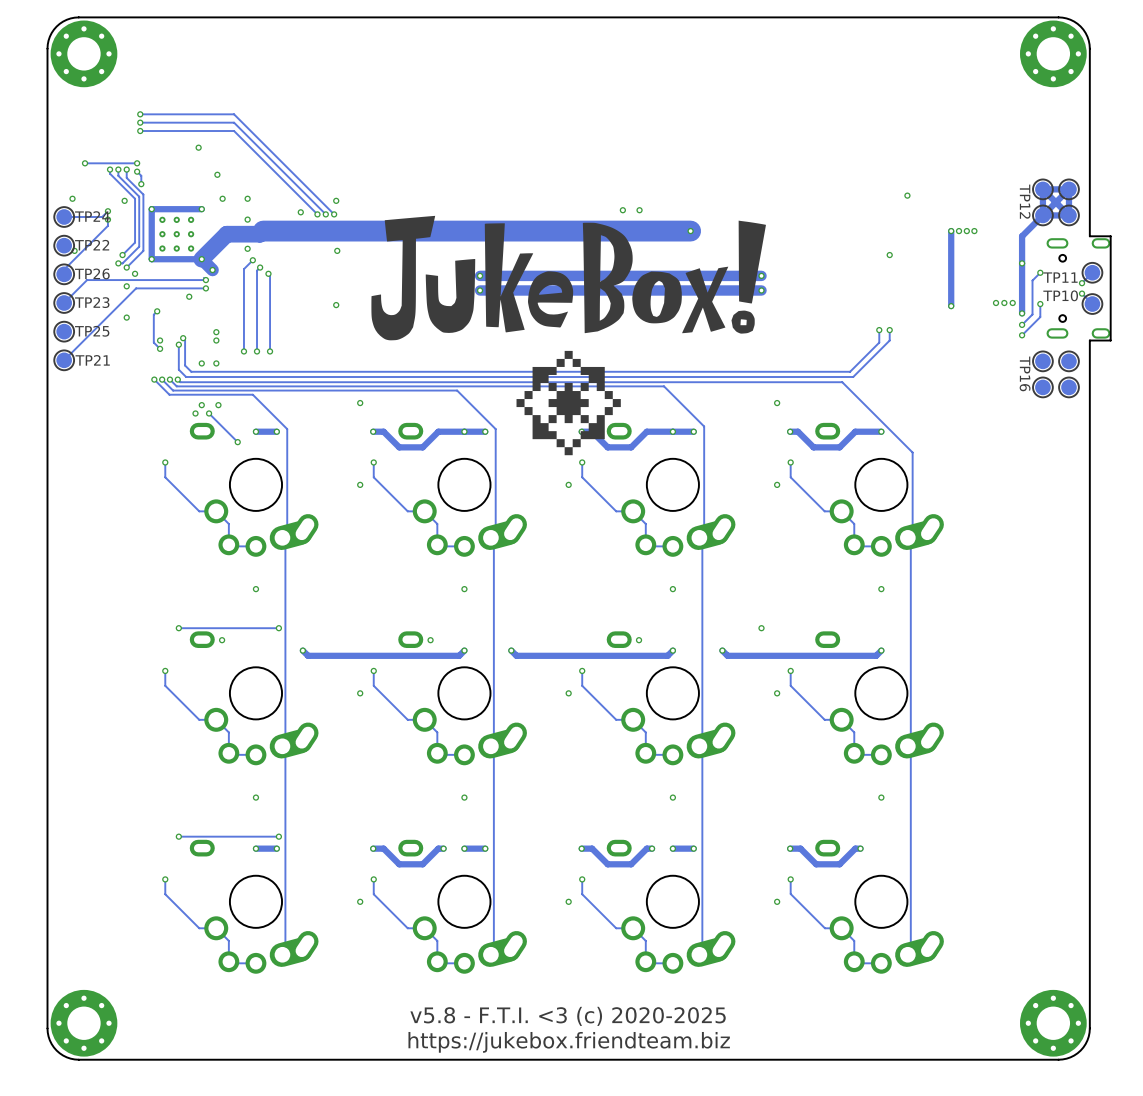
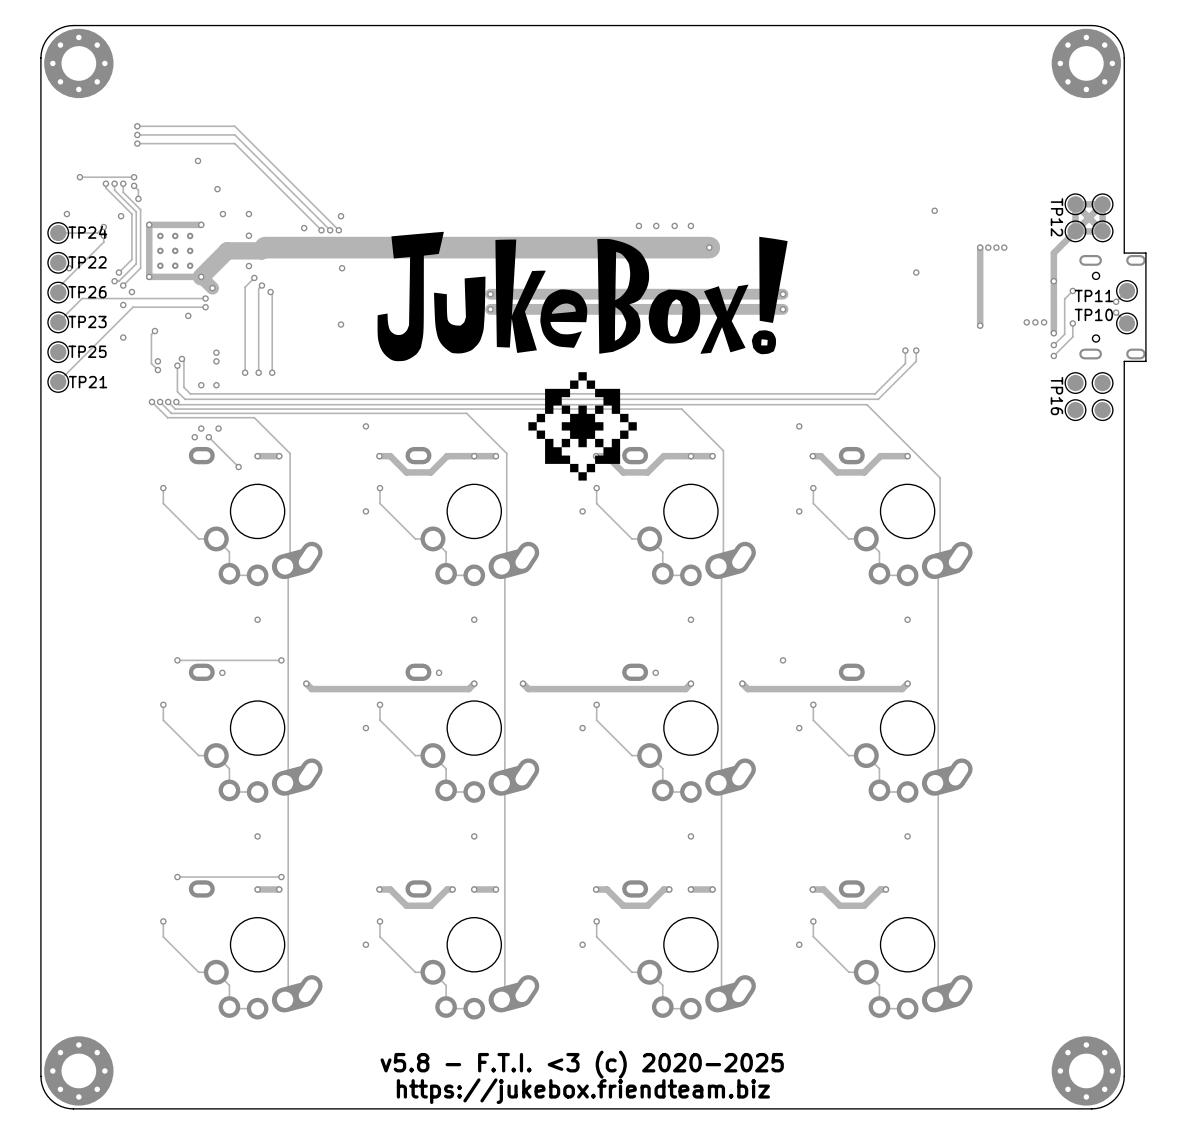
via: none -> (674, 225)
via: none -> (690, 225)

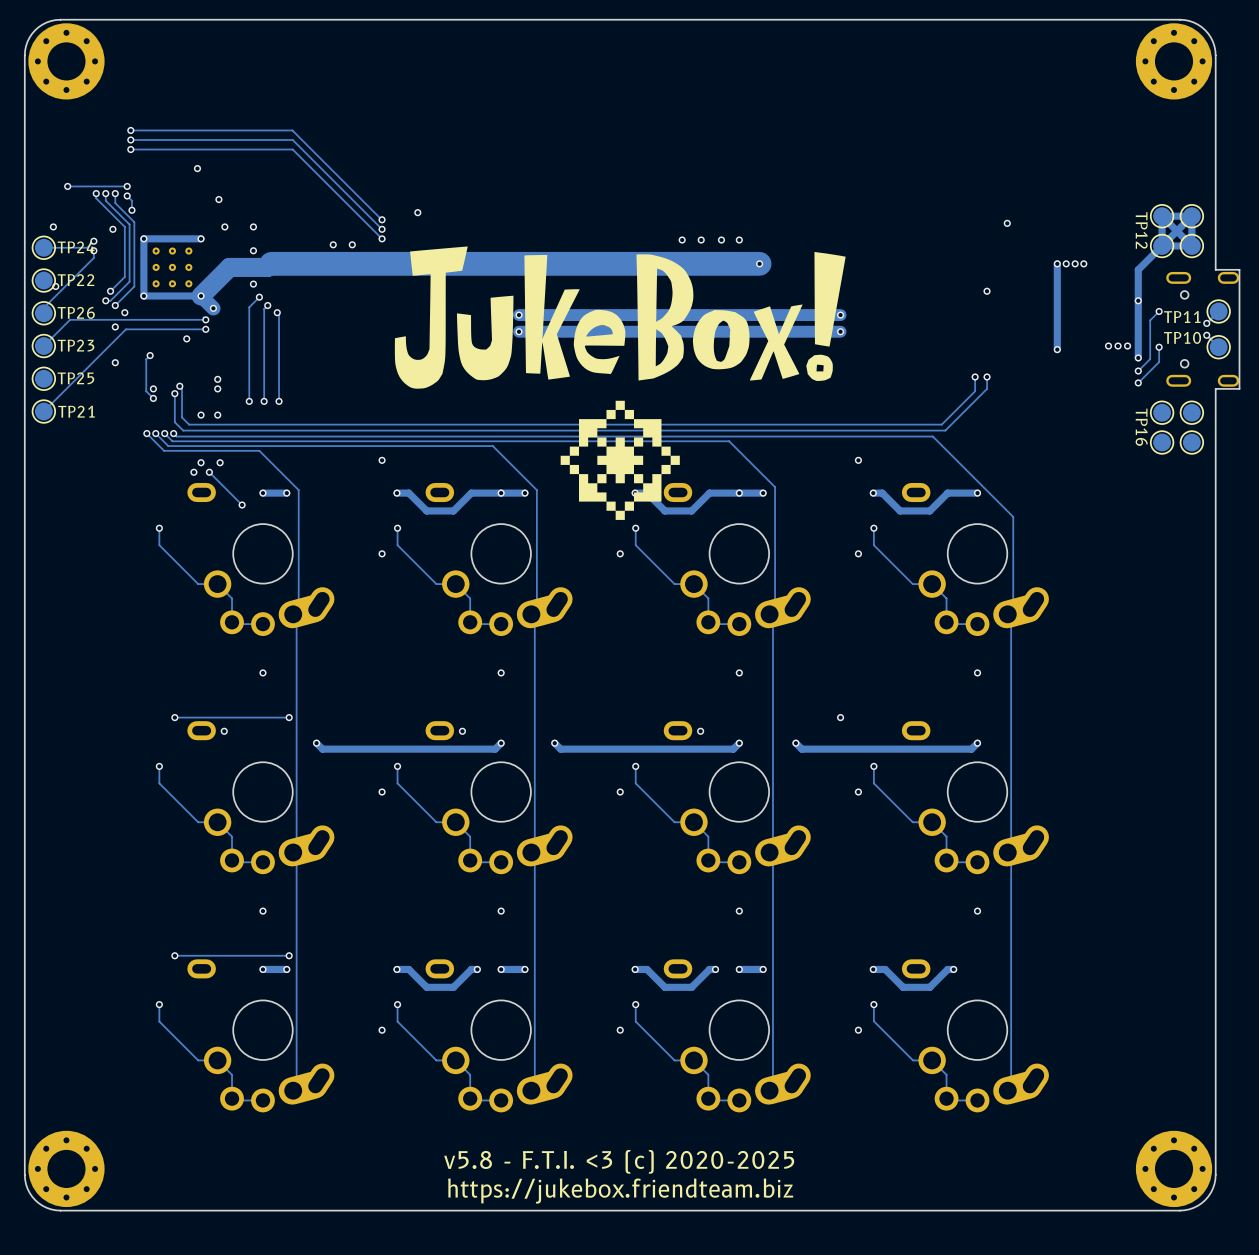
track: (234, 126) (338, 230) -> (237, 130) (292, 130) (382, 219)
track: (234, 134) (330, 230) -> (237, 140) (292, 140) (382, 229)
track: (234, 143) (321, 230) -> (237, 149) (292, 149) (382, 238)
via: none -> (417, 212)
via: none -> (382, 219)
via: (341, 216) -> none
via: none -> (382, 229)
via: none -> (382, 238)
via: (304, 228) -> none
via: (330, 230) -> none
via: (342, 268) -> none
via: (341, 324) -> none

